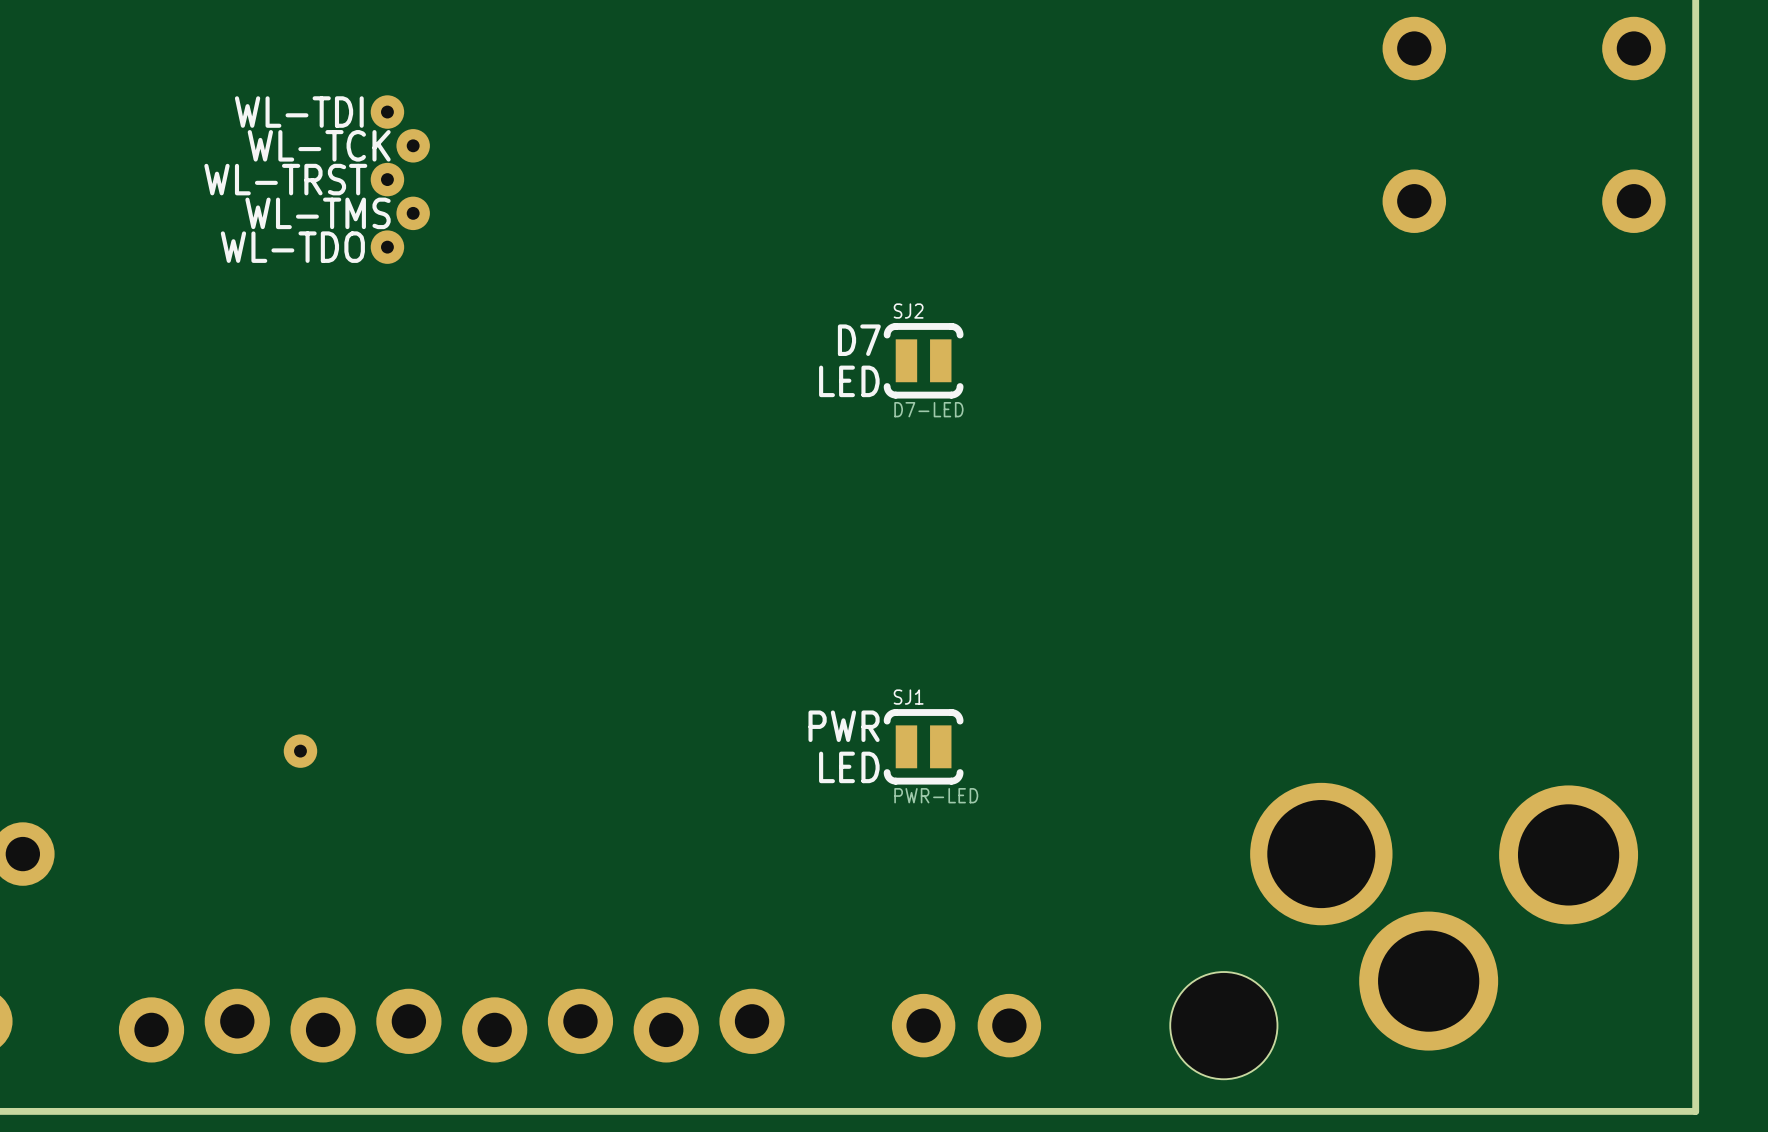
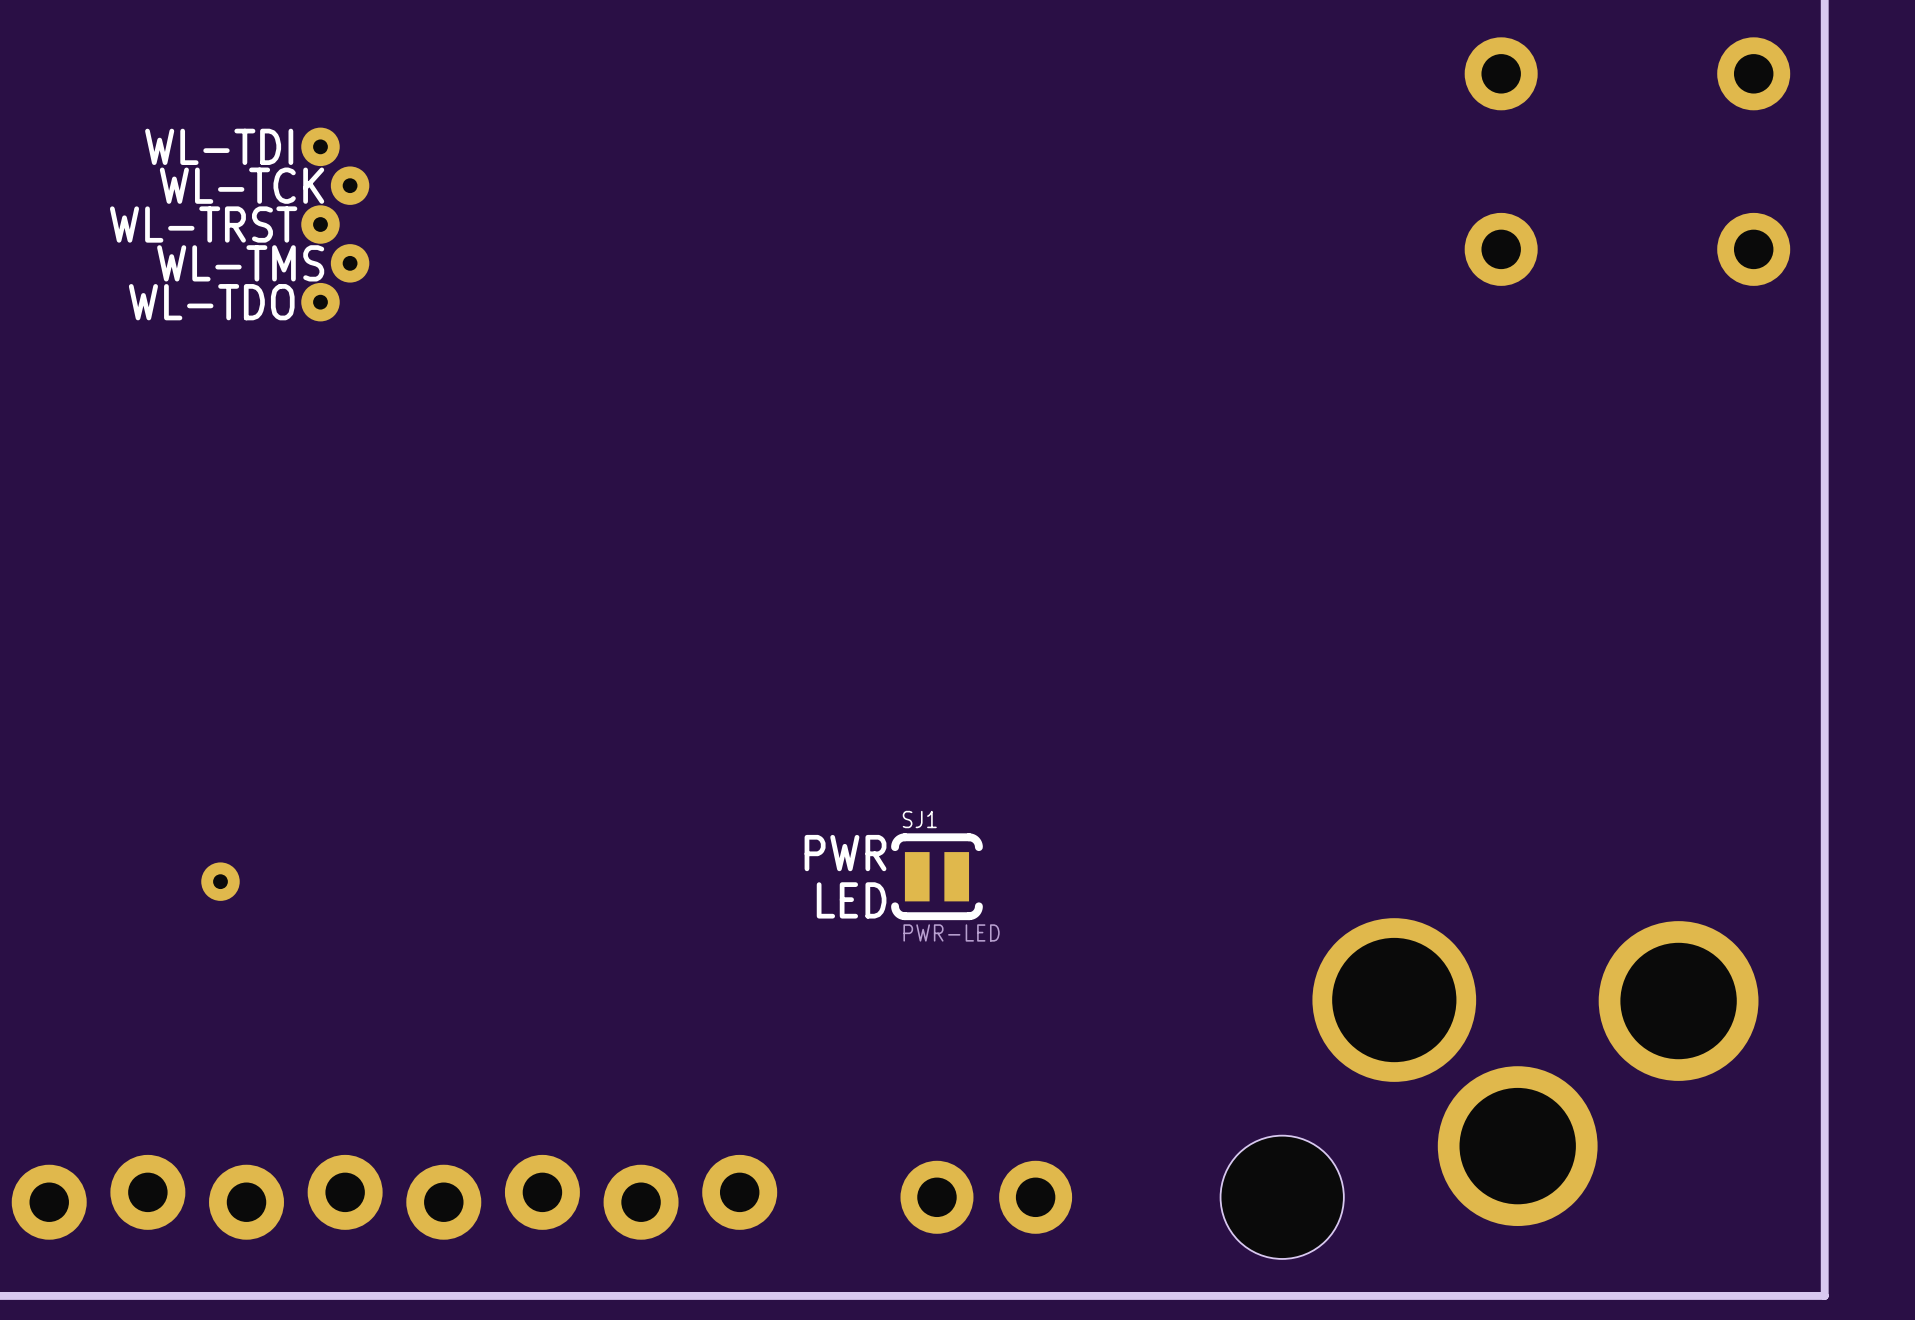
text: D7 (859, 340) -> none
SJ2: D7-LED (923, 360) -> none
text: LED (849, 381) -> none

